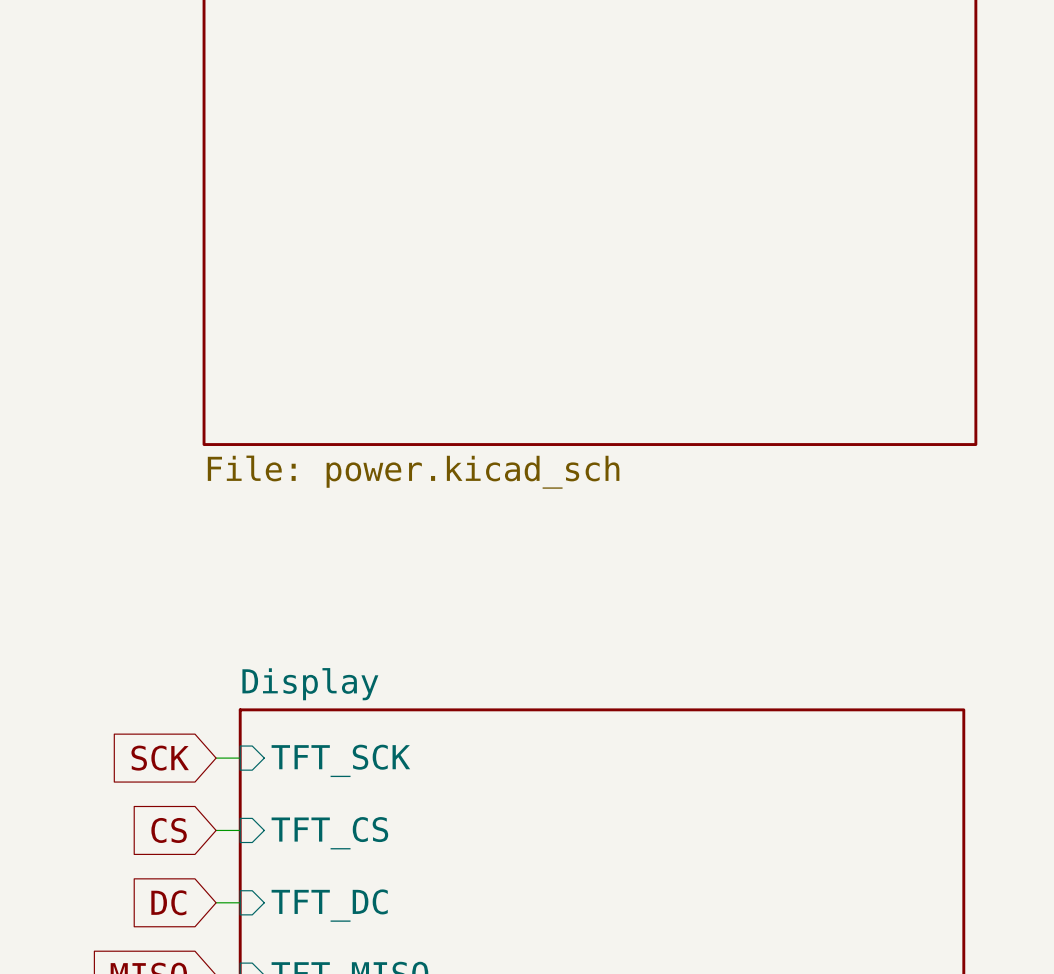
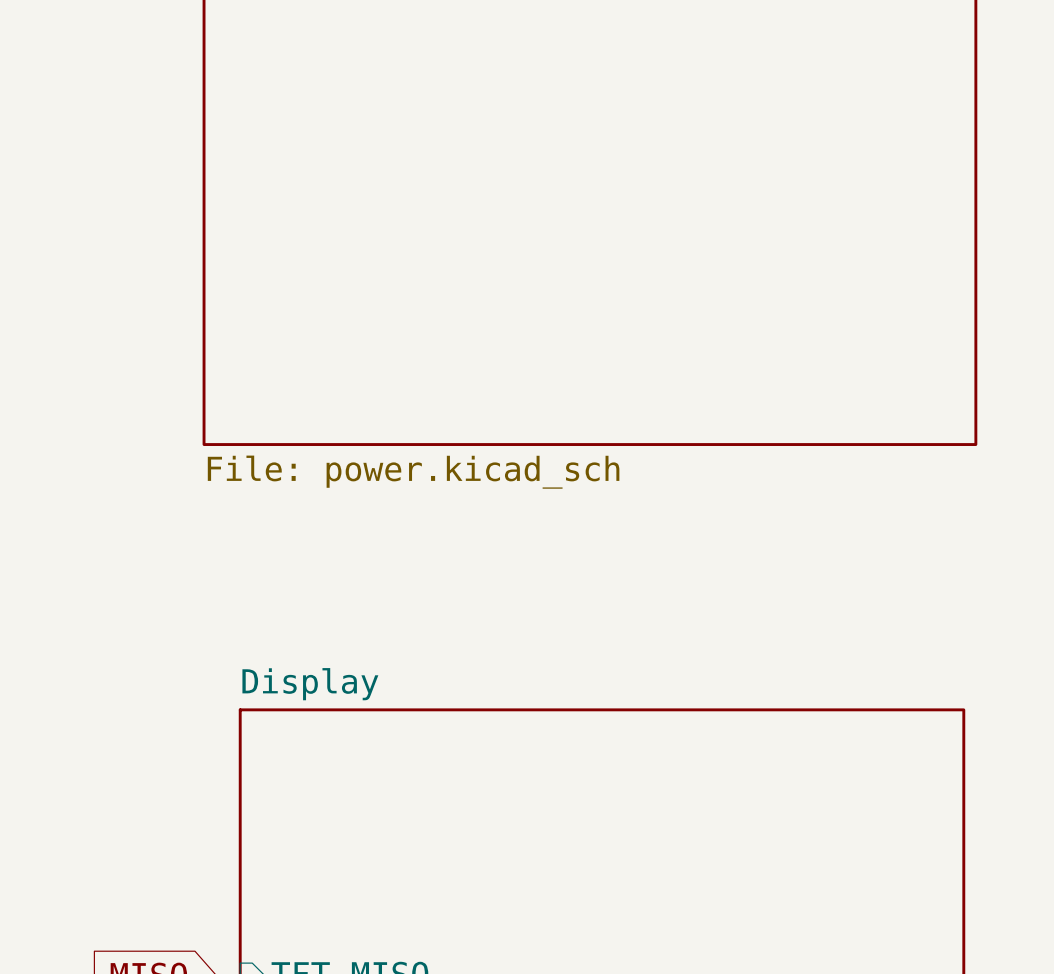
global label: SCK (160, 758) -> none
wire: (216, 758) (240, 758) -> none
sheet pin: TFT_SCK (340, 760) -> none
global label: CS (169, 830) -> none
wire: (216, 830) (240, 830) -> none
sheet pin: TFT_CS (329, 833) -> none
global label: DC (168, 902) -> none
wire: (216, 902) (240, 902) -> none
sheet pin: TFT_DC (329, 905) -> none

